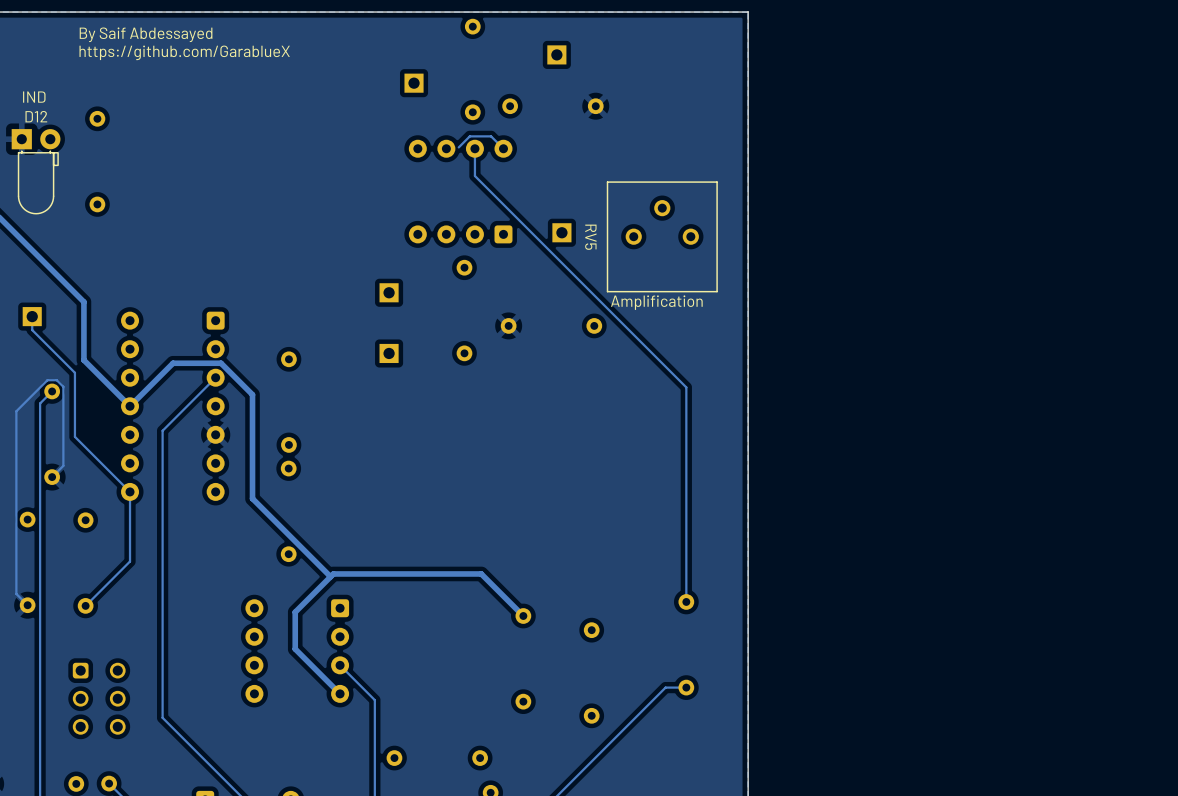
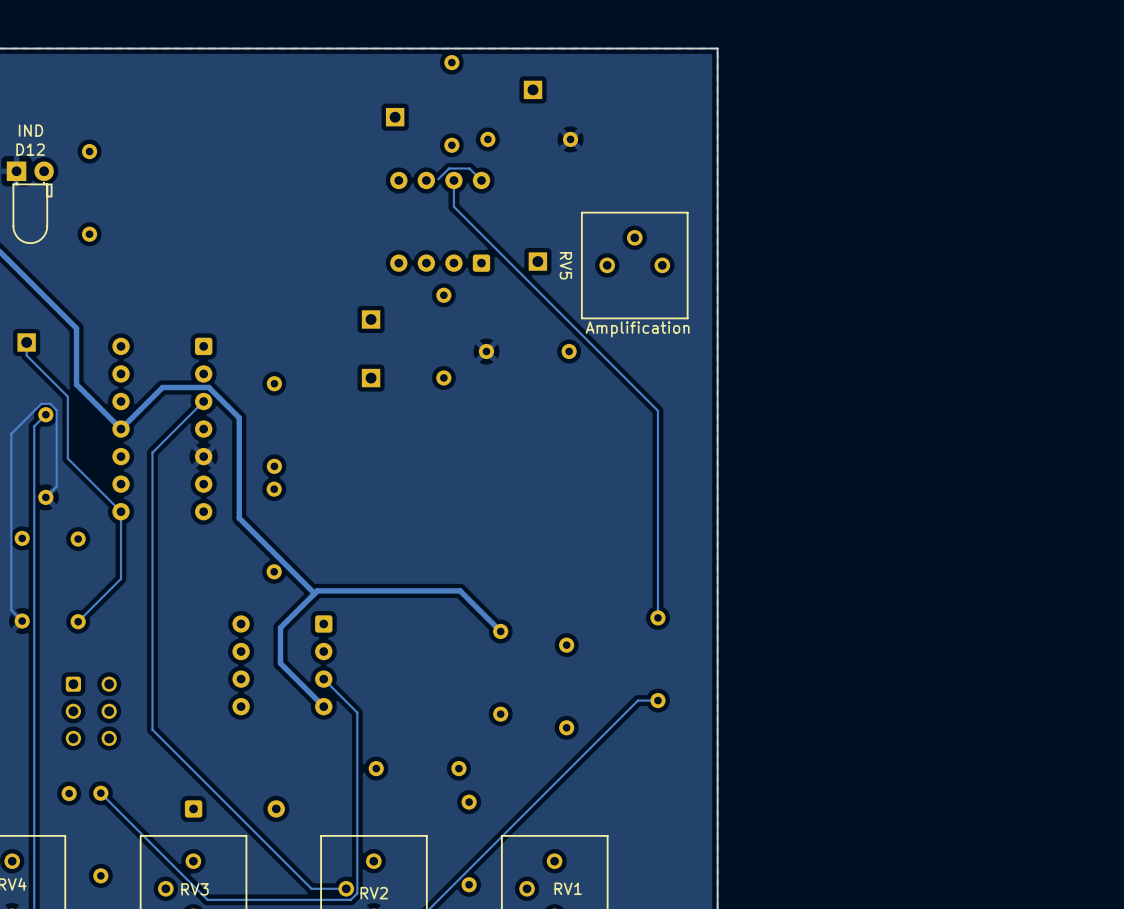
text: By Saif Abdessayed (146, 34) -> none
text: https://github.com/GarablueX (184, 52) -> none

